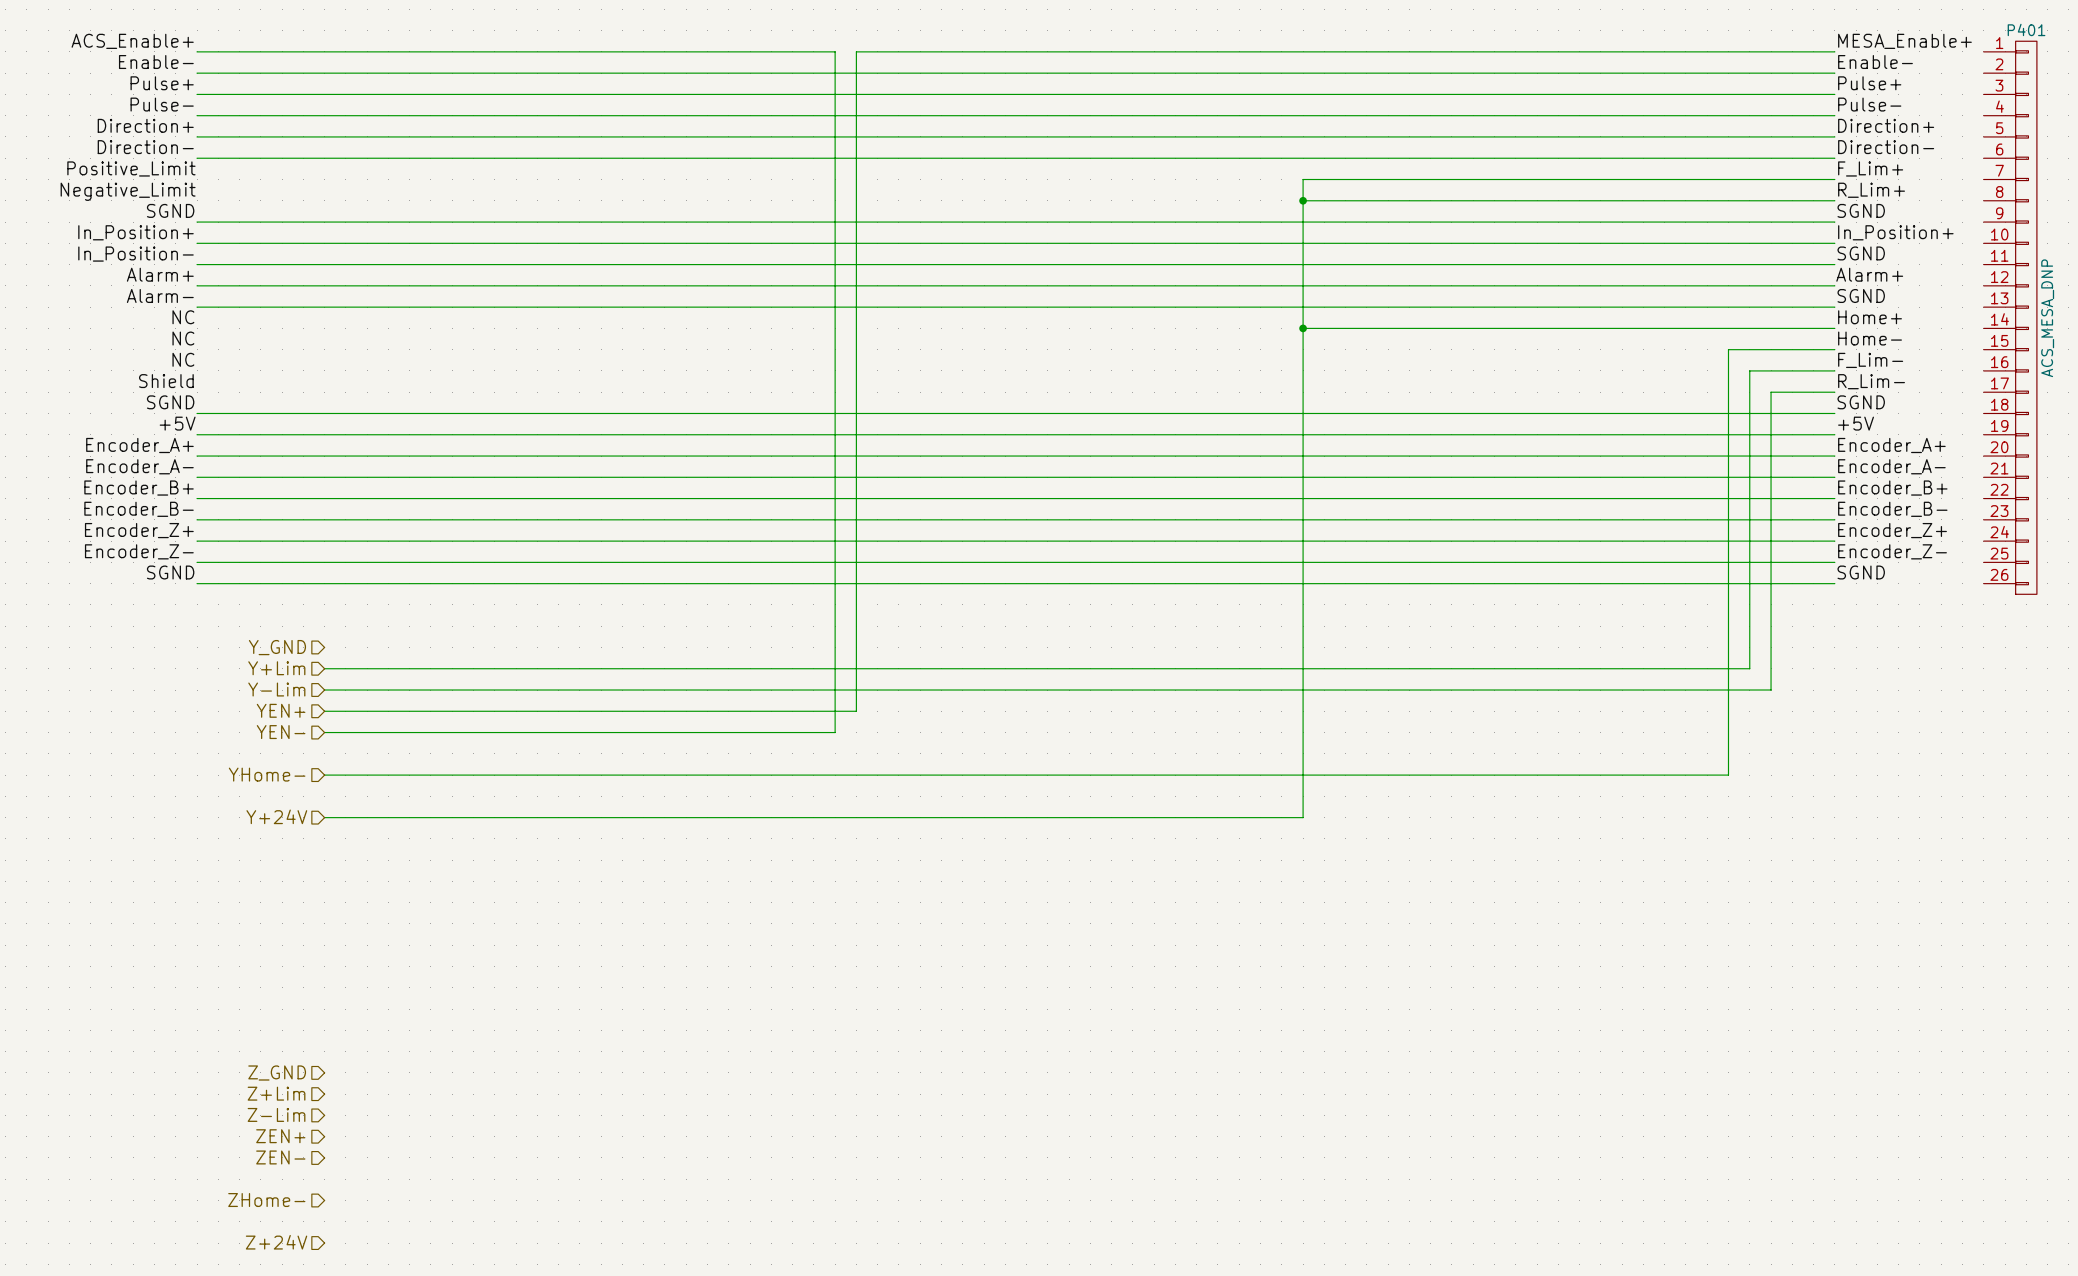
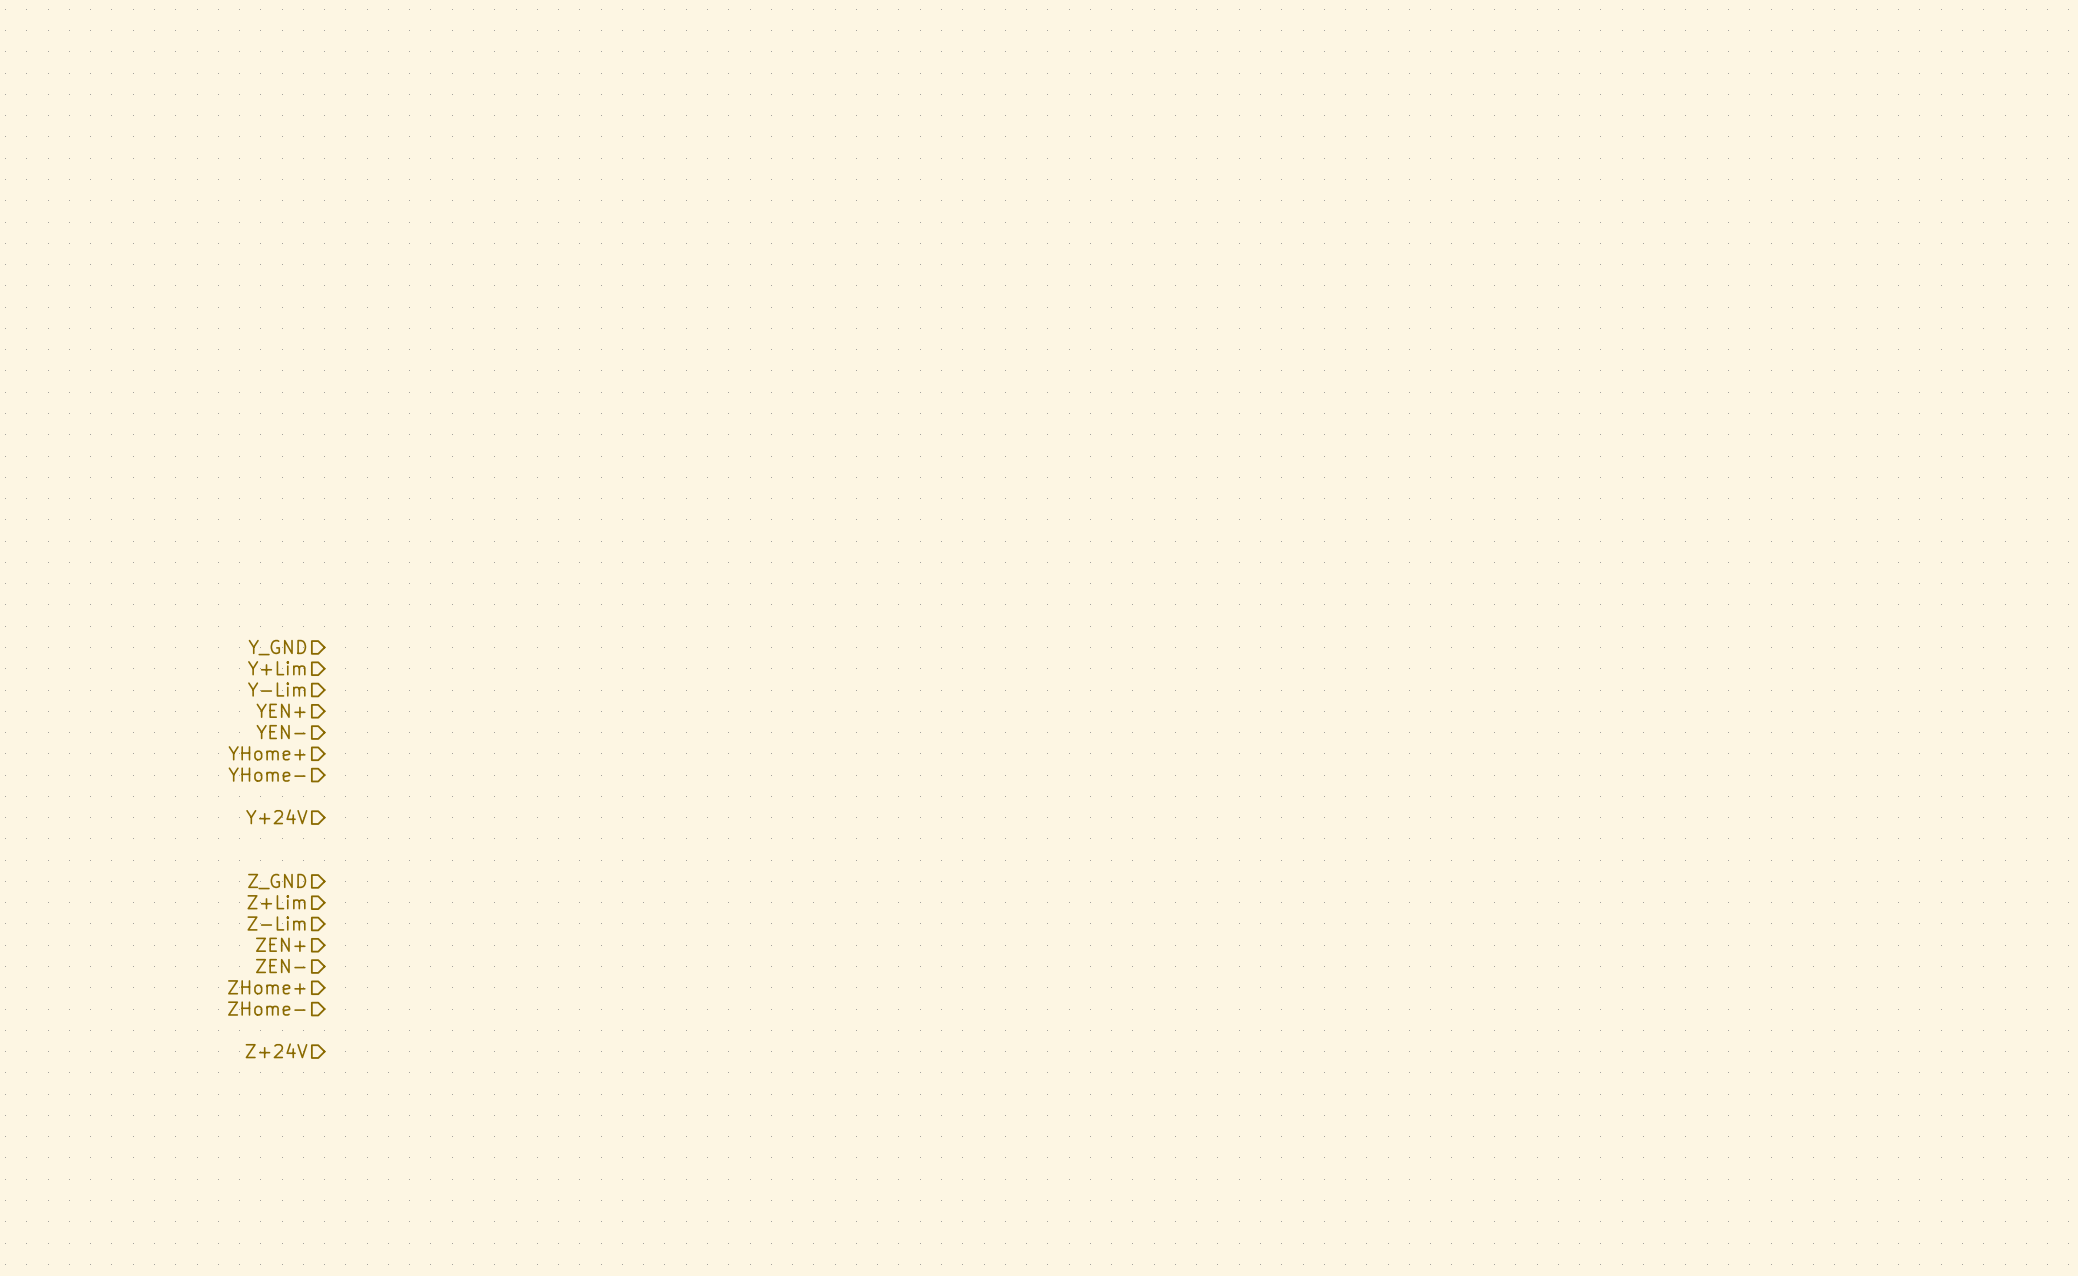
label: ACS_Enable+ (132, 41) -> none
label: MESA_Enable+ (1904, 41) -> none
wire: (197, 51) (835, 51) (835, 732) (324, 732) -> none
wire: (1834, 51) (856, 51) (856, 711) (324, 711) -> none
label: Enable- (156, 62) -> none
label: Enable- (1875, 62) -> none
wire: (197, 73) (1834, 73) -> none
label: Pulse+ (162, 83) -> none
label: Pulse+ (1869, 83) -> none
wire: (197, 94) (1834, 94) -> none
label: Pulse- (162, 104) -> none
label: Pulse- (1869, 104) -> none
wire: (197, 115) (1834, 115) -> none
label: Direction+ (145, 125) -> none
label: Direction+ (1886, 125) -> none
wire: (197, 136) (1834, 136) -> none
label: Direction- (145, 147) -> none
label: Direction- (1886, 147) -> none
wire: (197, 158) (1834, 158) -> none
label: Positive_Limit (131, 168) -> none
label: F_Lim+ (1870, 168) -> none
wire: (1834, 179) (1303, 179) (1303, 817) (324, 817) -> none
label: R_Lim+ (1871, 190) -> none
label: Negative_Limit (128, 191) -> none
wire: (1303, 200) (1834, 200) -> none
junction: (1303, 200) -> none
label: SGND (170, 210) -> none
label: SGND (1861, 210) -> none
wire: (197, 222) (1834, 222) -> none
label: In_Position+ (135, 232) -> none
label: In_Position+ (1895, 232) -> none
wire: (197, 243) (1834, 243) -> none
label: SGND (1861, 253) -> none
label: In_Position- (135, 254) -> none
wire: (197, 264) (1834, 264) -> none
label: Alarm+ (160, 274) -> none
label: Alarm+ (1869, 274) -> none
wire: (197, 285) (1834, 285) -> none
label: Alarm- (160, 295) -> none
label: SGND (1861, 295) -> none
wire: (197, 307) (1834, 307) -> none
label: NC (183, 317) -> none
label: Home+ (1870, 317) -> none
P401: ACS_MESA_DNP (2010, 317) -> none
wire: (1303, 328) (1834, 328) -> none
junction: (1303, 328) -> none
label: NC (183, 338) -> none
label: Home- (1870, 338) -> none
wire: (1834, 349) (1728, 349) (1728, 775) (324, 775) -> none
label: NC (183, 359) -> none
label: F_Lim- (1870, 360) -> none
wire: (1834, 370) (1749, 370) (1749, 668) (324, 668) -> none
label: Shield (166, 381) -> none
label: R_Lim- (1871, 381) -> none
wire: (1834, 392) (1771, 392) (1771, 690) (324, 690) -> none
label: SGND (170, 402) -> none
label: SGND (1861, 402) -> none
wire: (197, 413) (1834, 413) -> none
label: +5V (177, 423) -> none
label: +5V (1856, 423) -> none
wire: (197, 434) (1834, 434) -> none
label: Encoder_A+ (139, 445) -> none
label: Encoder_A+ (1891, 445) -> none
wire: (197, 456) (1834, 456) -> none
label: Encoder_A- (139, 466) -> none
label: Encoder_A- (1891, 466) -> none
wire: (197, 477) (1834, 477) -> none
label: Encoder_B+ (139, 488) -> none
label: Encoder_B+ (1892, 488) -> none
wire: (197, 498) (1834, 498) -> none
label: Encoder_B- (139, 509) -> none
label: Encoder_B- (1892, 509) -> none
wire: (197, 519) (1834, 519) -> none
label: Encoder_Z+ (139, 530) -> none
label: Encoder_Z+ (1892, 530) -> none
wire: (197, 541) (1834, 541) -> none
label: Encoder_Z- (139, 551) -> none
label: Encoder_Z- (1892, 551) -> none
wire: (197, 562) (1834, 562) -> none
label: SGND (170, 572) -> none
label: SGND (1861, 572) -> none
wire: (197, 583) (1834, 583) -> none
hierarchical label: none -> YHome+ (267, 753)
hierarchical label: none -> ZHome+ (266, 987)
hierarchical label position: Z_GND (277, 1073) -> Z_GND (277, 881)
hierarchical label position: Z+Lim (276, 1093) -> Z+Lim (276, 902)
hierarchical label position: Z-Lim (276, 1114) -> Z-Lim (276, 923)
hierarchical label position: ZEN+ (280, 1136) -> ZEN+ (280, 944)
hierarchical label position: ZEN- (280, 1157) -> ZEN- (280, 966)
hierarchical label position: ZHome- (266, 1200) -> ZHome- (266, 1008)
hierarchical label position: Z+24V (276, 1242) -> Z+24V (276, 1050)

